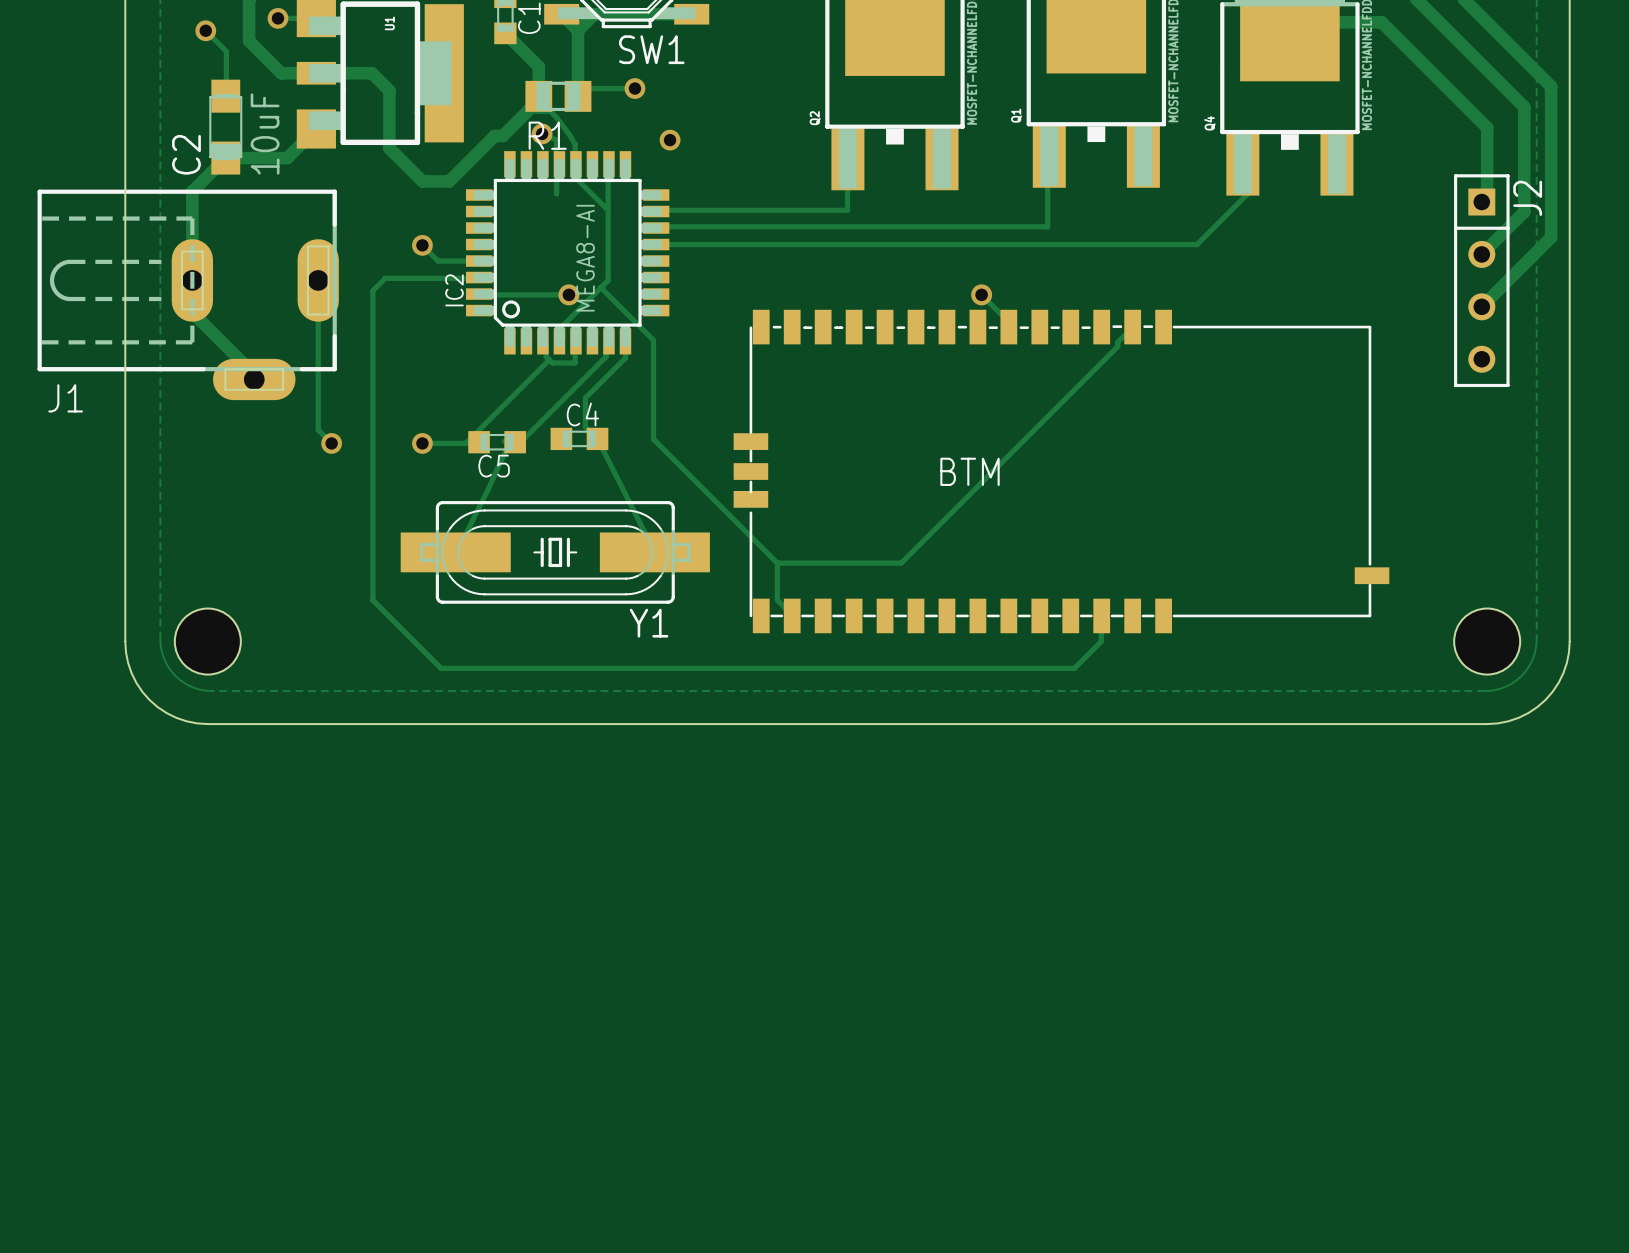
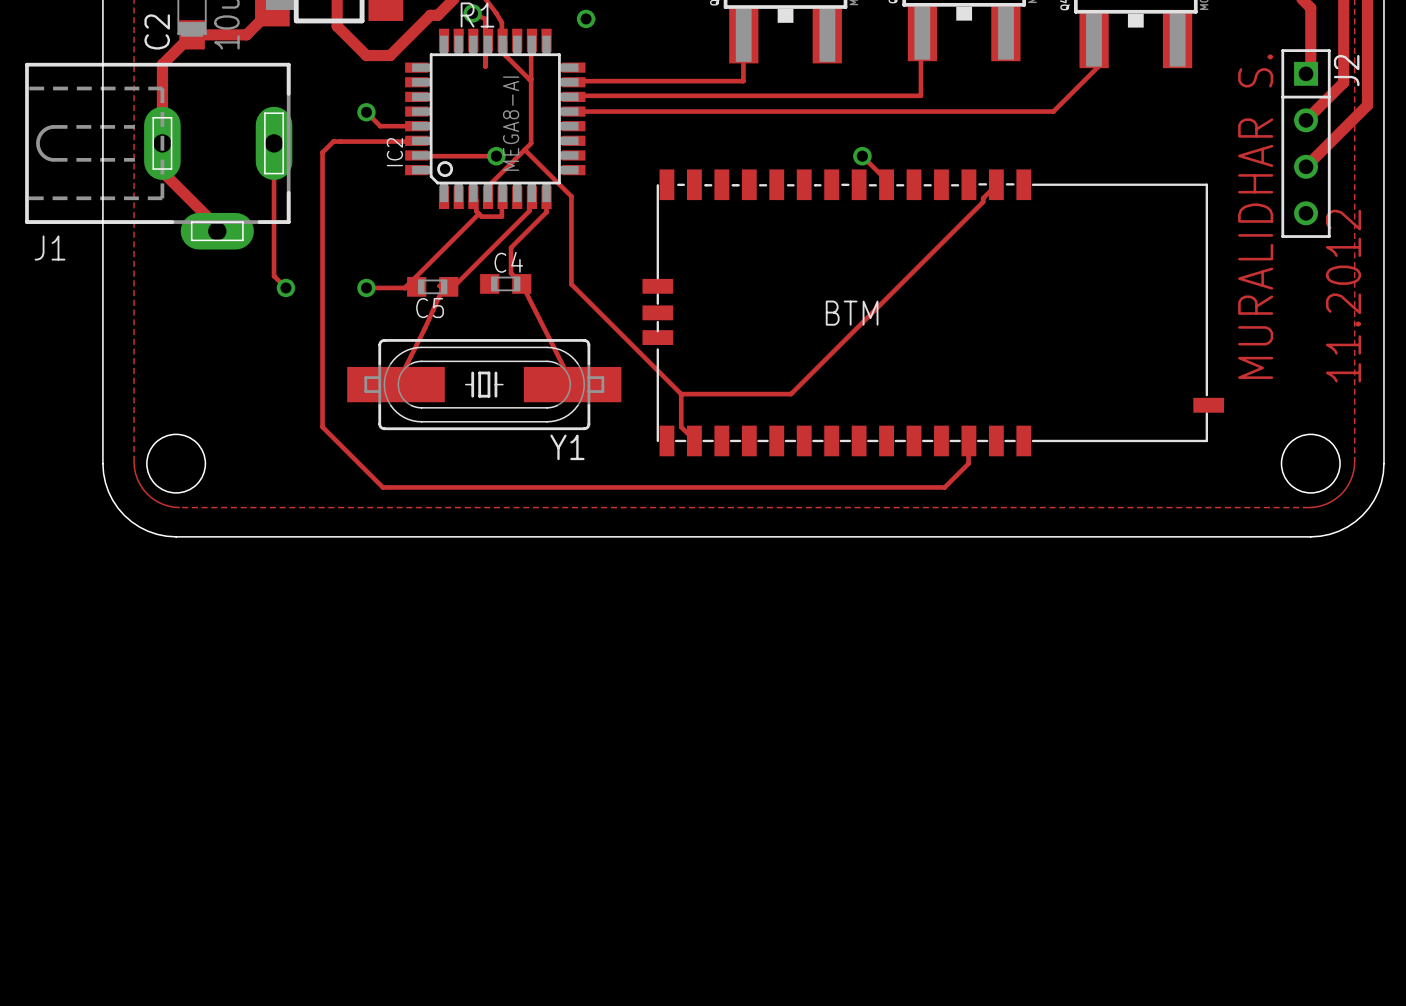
text: none -> MURALIDHAR S. (1255, 216)
text: none -> 11.2012 (1343, 296)

